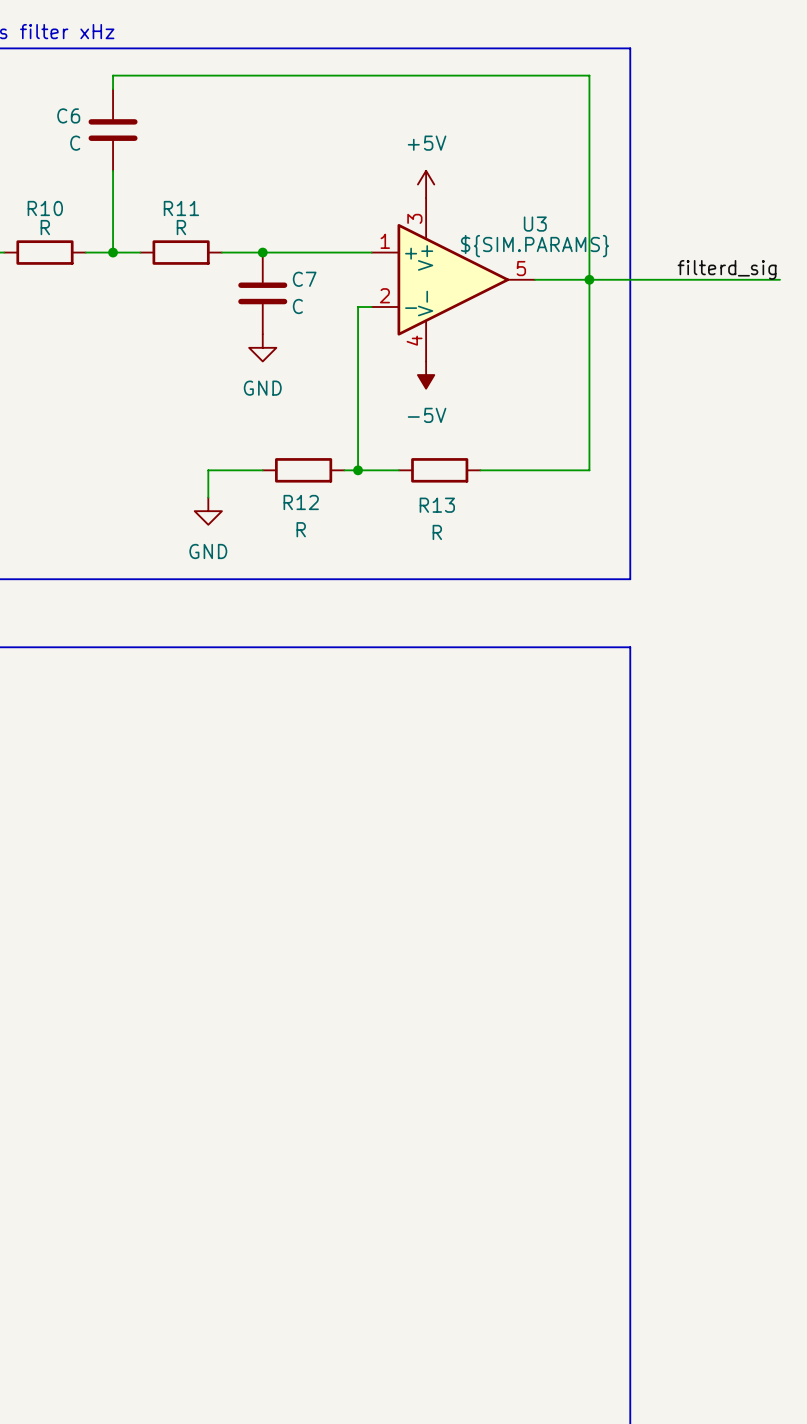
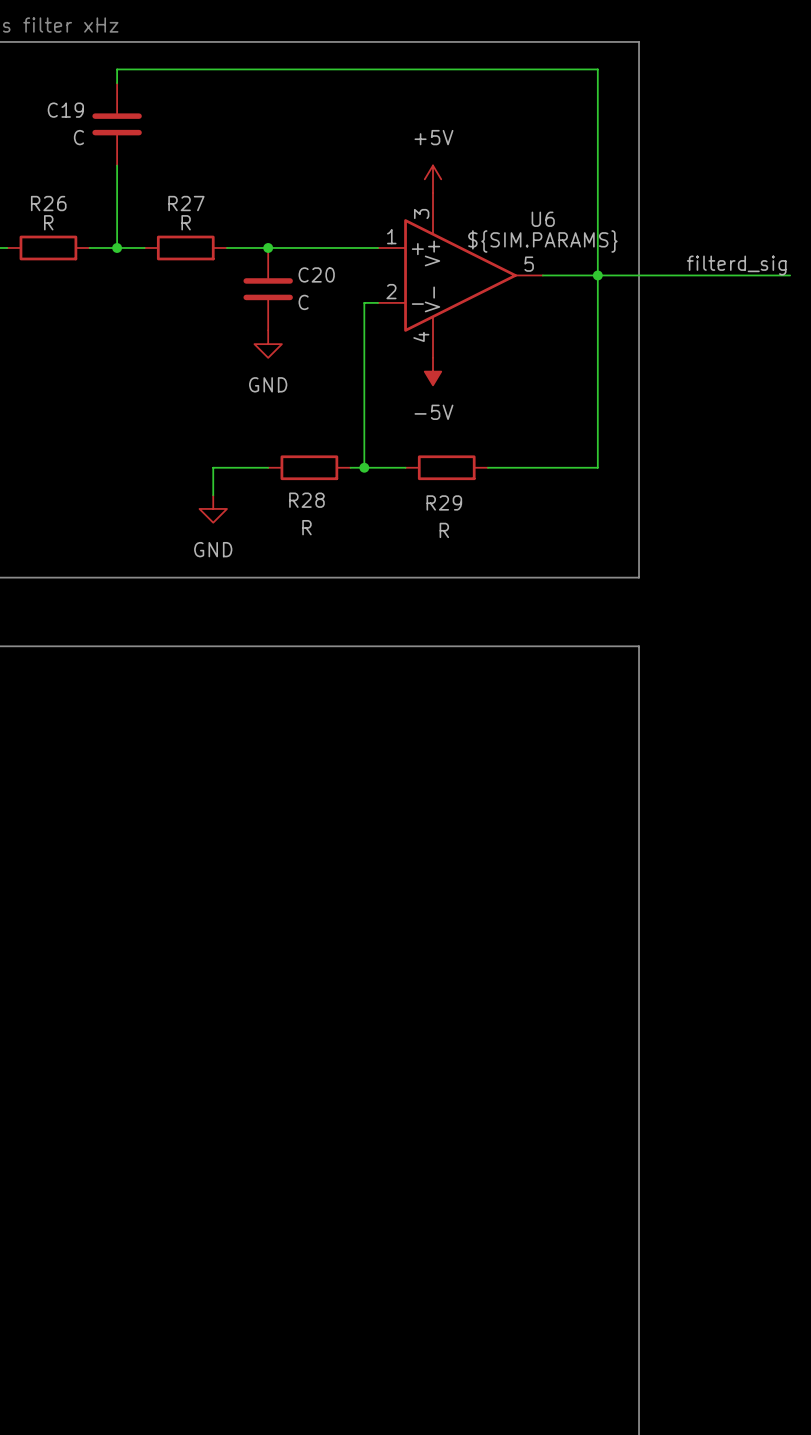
C6 name: C6 (68, 115) -> C19 (65, 110)
R10 name: R10 (45, 208) -> R26 (48, 203)
R11 name: R11 (181, 208) -> R27 (186, 203)
U3 name: U3 (535, 224) -> U6 (543, 219)
C7 name: C7 (304, 279) -> C20 (316, 274)
R12 name: R12 (301, 502) -> R28 (306, 500)
R13 name: R13 (437, 505) -> R29 (444, 502)

